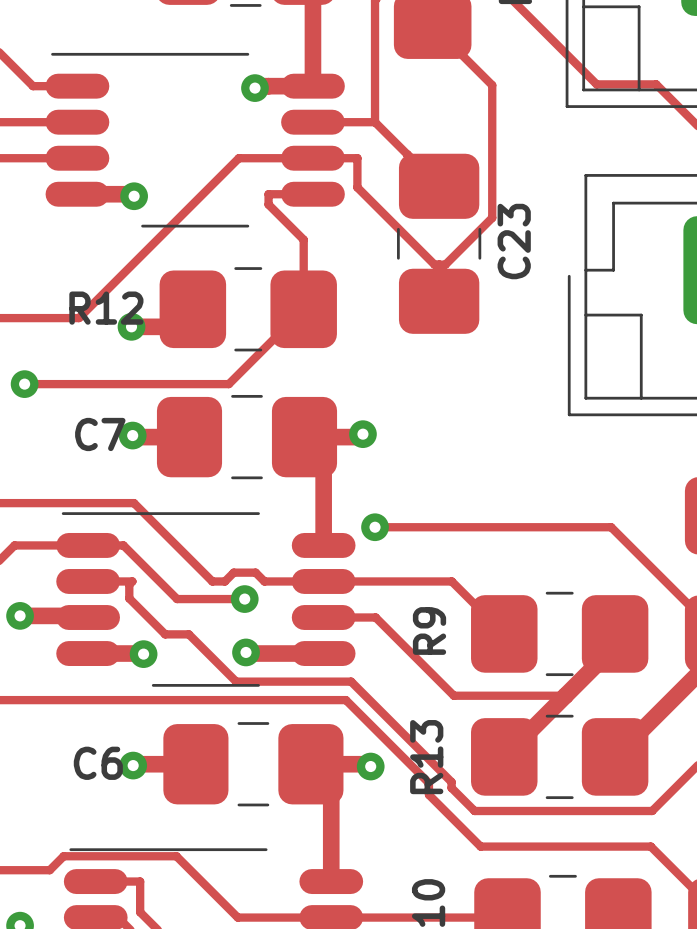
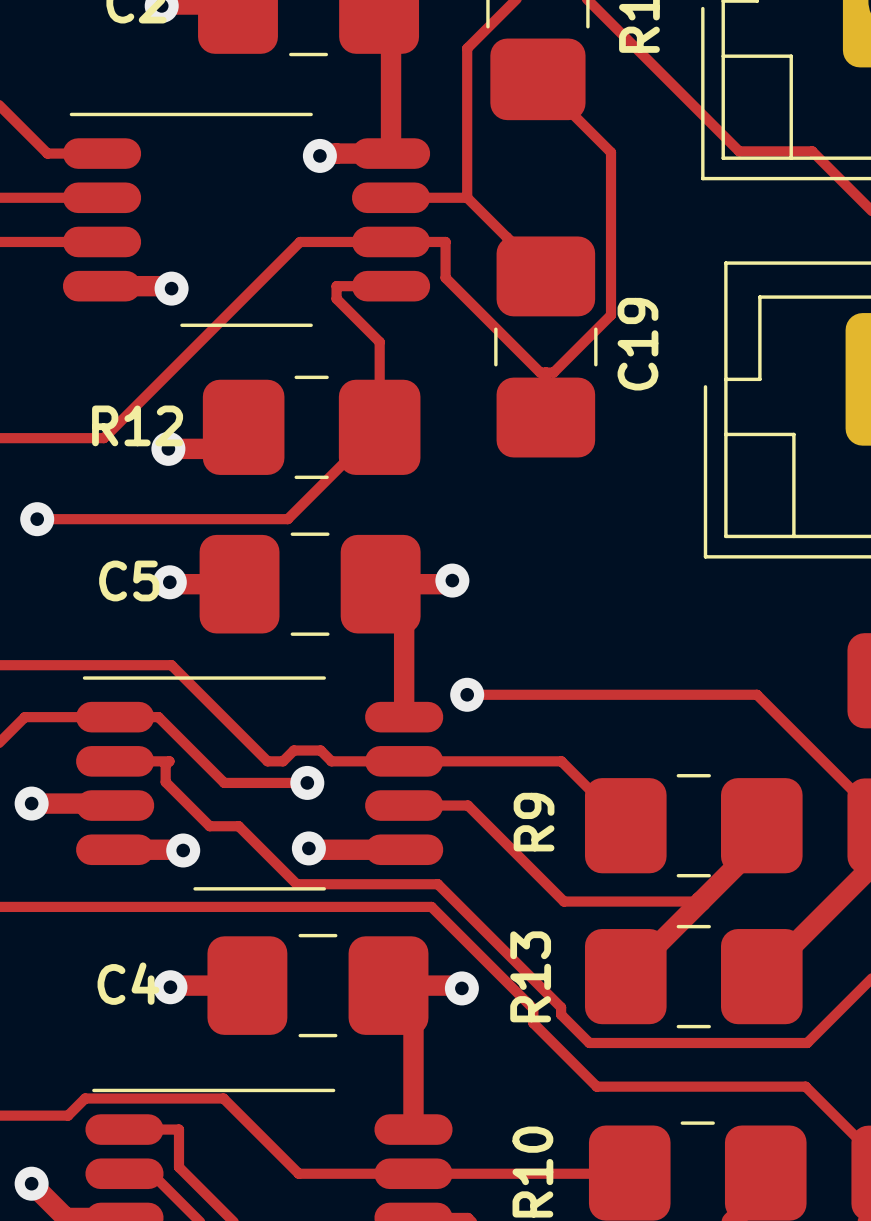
C23 name: C23 (514, 241) -> C19 (637, 344)
C7 name: C7 (100, 434) -> C5 (129, 580)
C6 name: C6 (98, 763) -> C4 (128, 983)

